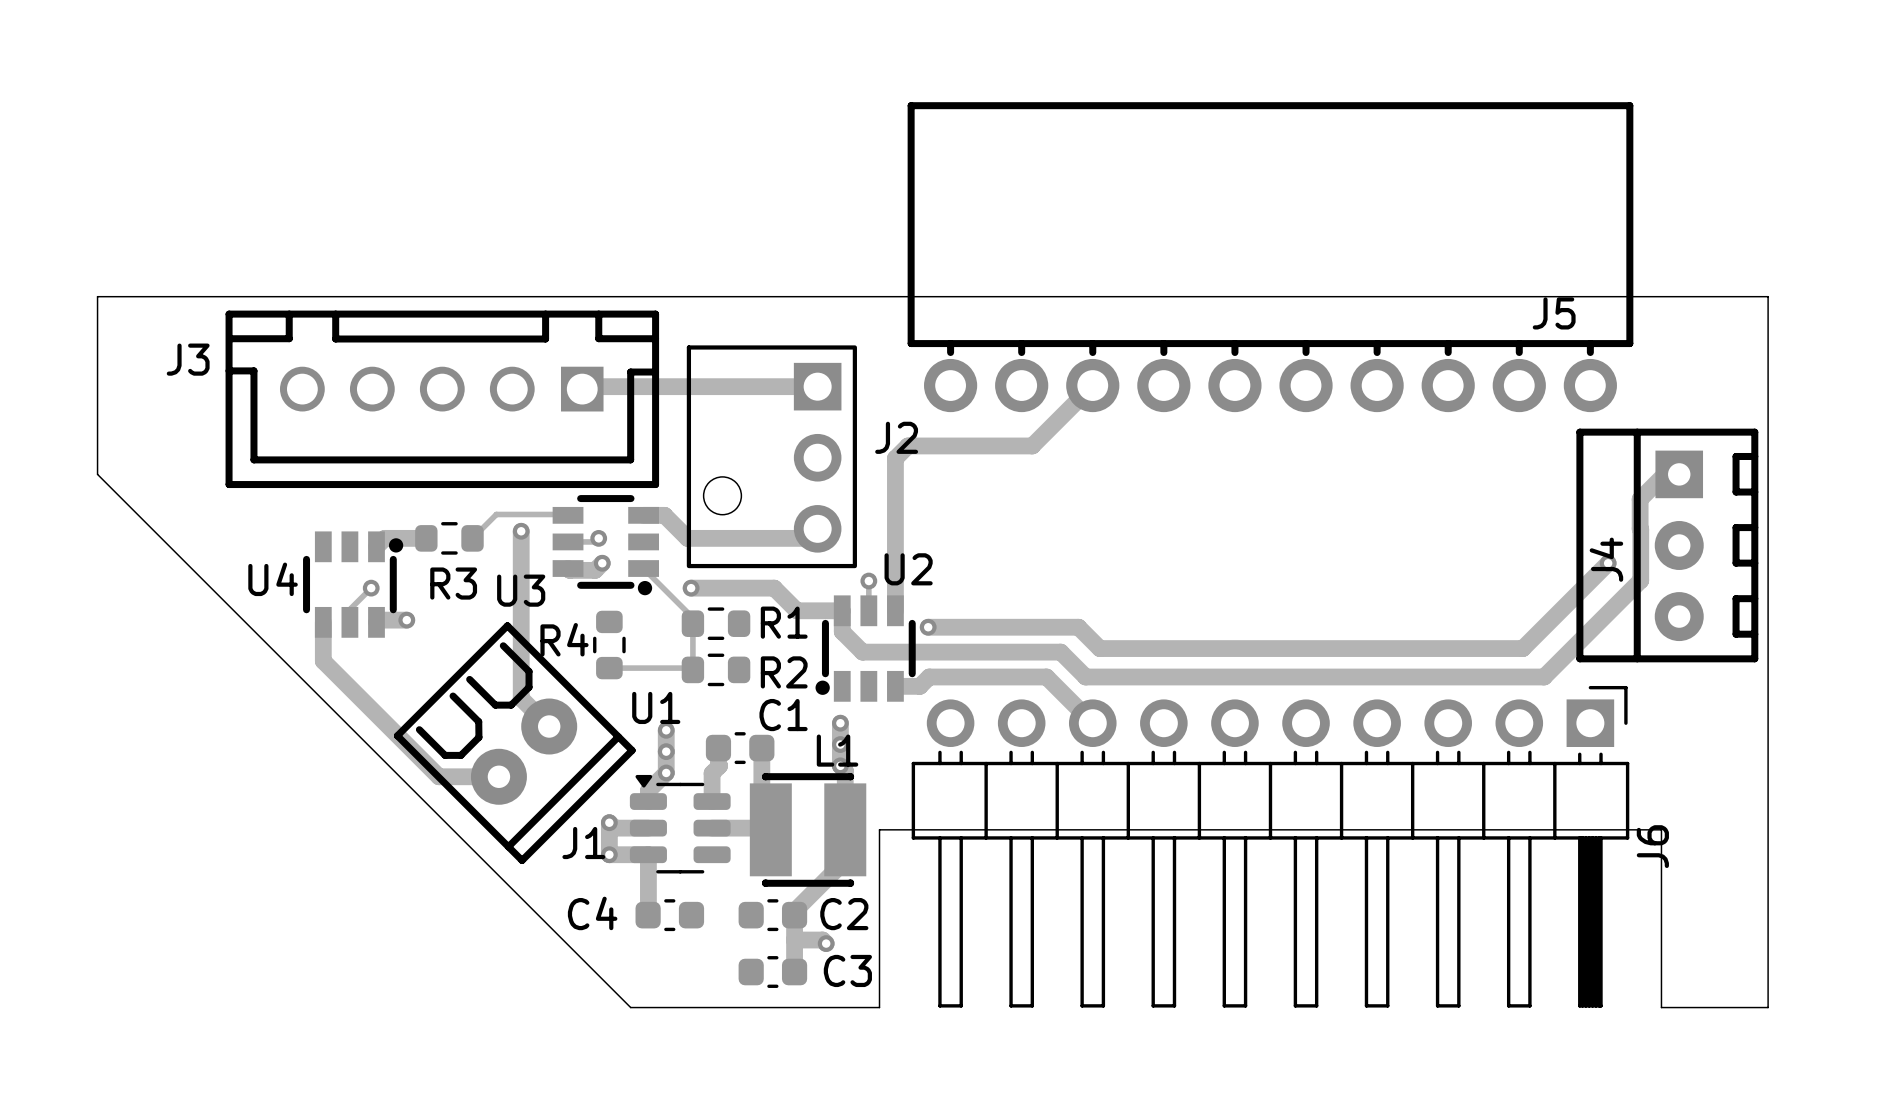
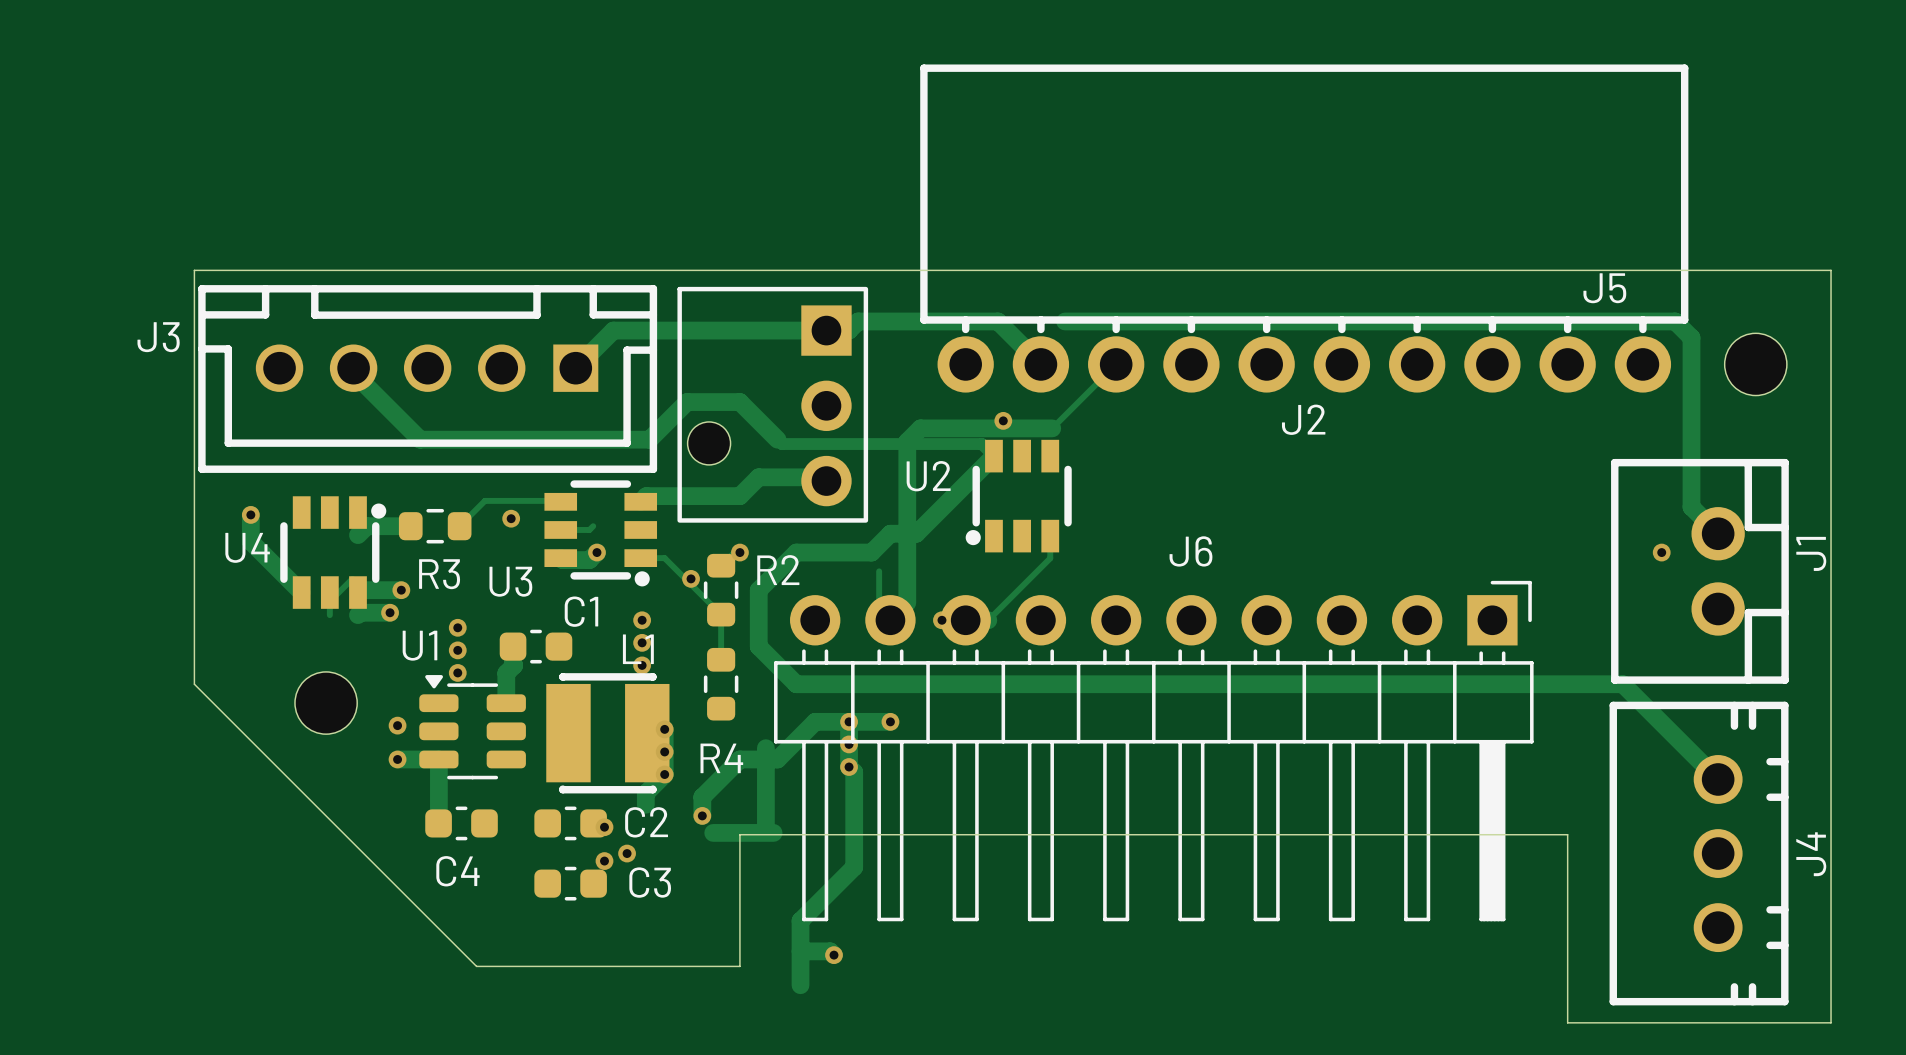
board edge: (221, 296) (97, 296) (97, 474) (630, 1007) (879, 1007) (879, 829) -> (194, 270) (194, 684) (476, 966) (739, 966) (739, 834) (890, 834)
track: none -> (1065, 321) (1675, 321) (1691, 337) (1691, 507) (1718, 533)
J2 footprint: [686, 345, 857, 569] -> [677, 286, 869, 523]
track width: thick (1092, 385) (1032, 445) -> thin (1116, 364) (1052, 428)
part: none -> (1755, 364)
track: (584, 386) (817, 386) -> (578, 365) (613, 330) (849, 330) (858, 321) (997, 321) (1040, 364)
track: none -> (353, 368) (353, 373) (420, 439) (649, 439) (687, 402) (739, 402) (781, 444) (981, 444) (993, 456) (916, 533) (890, 533) (871, 552) (796, 552) (758, 590) (758, 646) (796, 684) (1622, 684) (1718, 779)
J4 footprint: [1576, 428, 1759, 663] -> [1609, 701, 1789, 1006]
J2 name position: J2 (896, 437) -> J2 (1303, 419)
via: none -> (1003, 420)
track: (1679, 474) (1665, 474) (1640, 499) (1640, 580) (1544, 677) (1085, 677) (1060, 652) (862, 652) (842, 631) (842, 610) (796, 610) (774, 588) (691, 588) -> none
track: (643, 515) (664, 515) (687, 538) (808, 538) (817, 528) -> (640, 501) (646, 496) (739, 496) (758, 477) (822, 477) (826, 481)
track: none -> (250, 514) (250, 541) (301, 592)
via: none -> (250, 514)
track: (521, 531) (521, 698) (549, 726) -> none
via: (598, 538) -> none
J4 name position: J4 (1606, 559) -> J4 (1811, 854)
via: none -> (739, 552)
track: (1608, 563) (1522, 648) (1099, 648) (1078, 627) (971, 627) -> (1050, 536) (1050, 558) (988, 620)
track: (643, 568) (692, 617) (692, 669) (691, 668) (609, 668) -> (640, 558) (664, 558) (721, 614) (721, 659)
U2 name position: U2 (908, 569) -> U2 (928, 476)
via: (868, 581) -> none
U4 position: (353, 584) -> (333, 552)
via position: (371, 588) -> (401, 590)
track: none -> (401, 590) (360, 590) (357, 592)
track: (323, 622) (323, 661) (438, 776) (498, 776) -> none
J1 footprint: [393, 622, 636, 864] -> [1611, 458, 1789, 684]
R1: (716, 623) -> none
via: none -> (642, 620)
via: none -> (457, 627)
R4 name position: R4 (564, 639) -> R4 (721, 758)
R4 position: (609, 645) -> (721, 684)
via: none -> (642, 642)
U2 position: (865, 648) -> (1018, 496)
via: none -> (457, 650)
via: none -> (642, 665)
R2 rotation: 0° (716, 669) -> 90° clockwise (721, 590)
R2 position: (716, 669) -> (721, 590)
via: none -> (457, 672)
track: (895, 686) (919, 686) (929, 677) (1046, 677) (1092, 723) -> none
part: none -> (326, 703)
U1 name position: U1 (656, 707) -> U1 (419, 645)
track: none -> (890, 721) (815, 721) (777, 759) (739, 759) (702, 797) (702, 815)
via: none -> (890, 721)
via: none -> (397, 725)
track: (718, 748) (719, 765) (712, 773) (712, 801) -> (513, 646) (514, 665) (506, 673) (506, 703)
C1 position: (740, 748) -> (536, 646)
track: none -> (397, 759) (438, 759) (438, 823)
via: none -> (397, 759)
via: none -> (702, 815)
U1 position: (680, 824) -> (472, 727)
track: (648, 828) (614, 828) (609, 822) (609, 854) (648, 854) (648, 914) -> none
L1 position: (808, 829) -> (607, 733)
board edge: (1519, 829) (1661, 829) (1661, 1007) -> (1567, 834) (1567, 1022) (1718, 1022)
J1 name position: J1 (583, 843) -> J1 (1811, 553)
J6 position: (1270, 846) -> (1153, 751)
J6 name rotation: 0° (1652, 846) -> 90° clockwise (1190, 551)
J6 name position: J6 (1652, 846) -> J6 (1190, 551)
via: none -> (627, 853)
C4 name position: C4 (592, 913) -> C4 (458, 871)
C4 position: (669, 915) -> (461, 823)
C2 position: (772, 915) -> (570, 823)
C3 position: (772, 972) -> (570, 883)

